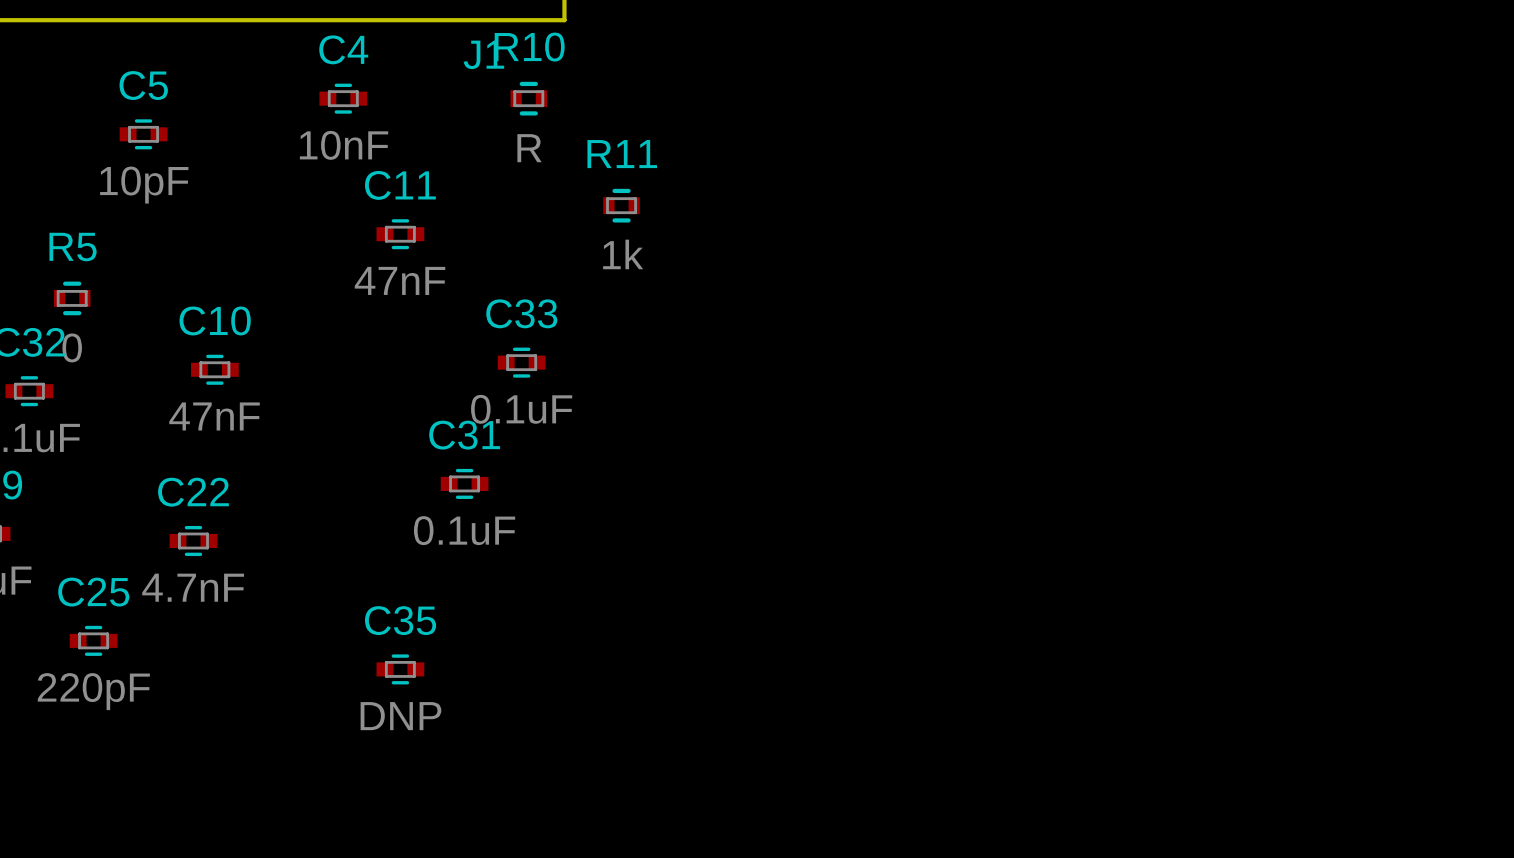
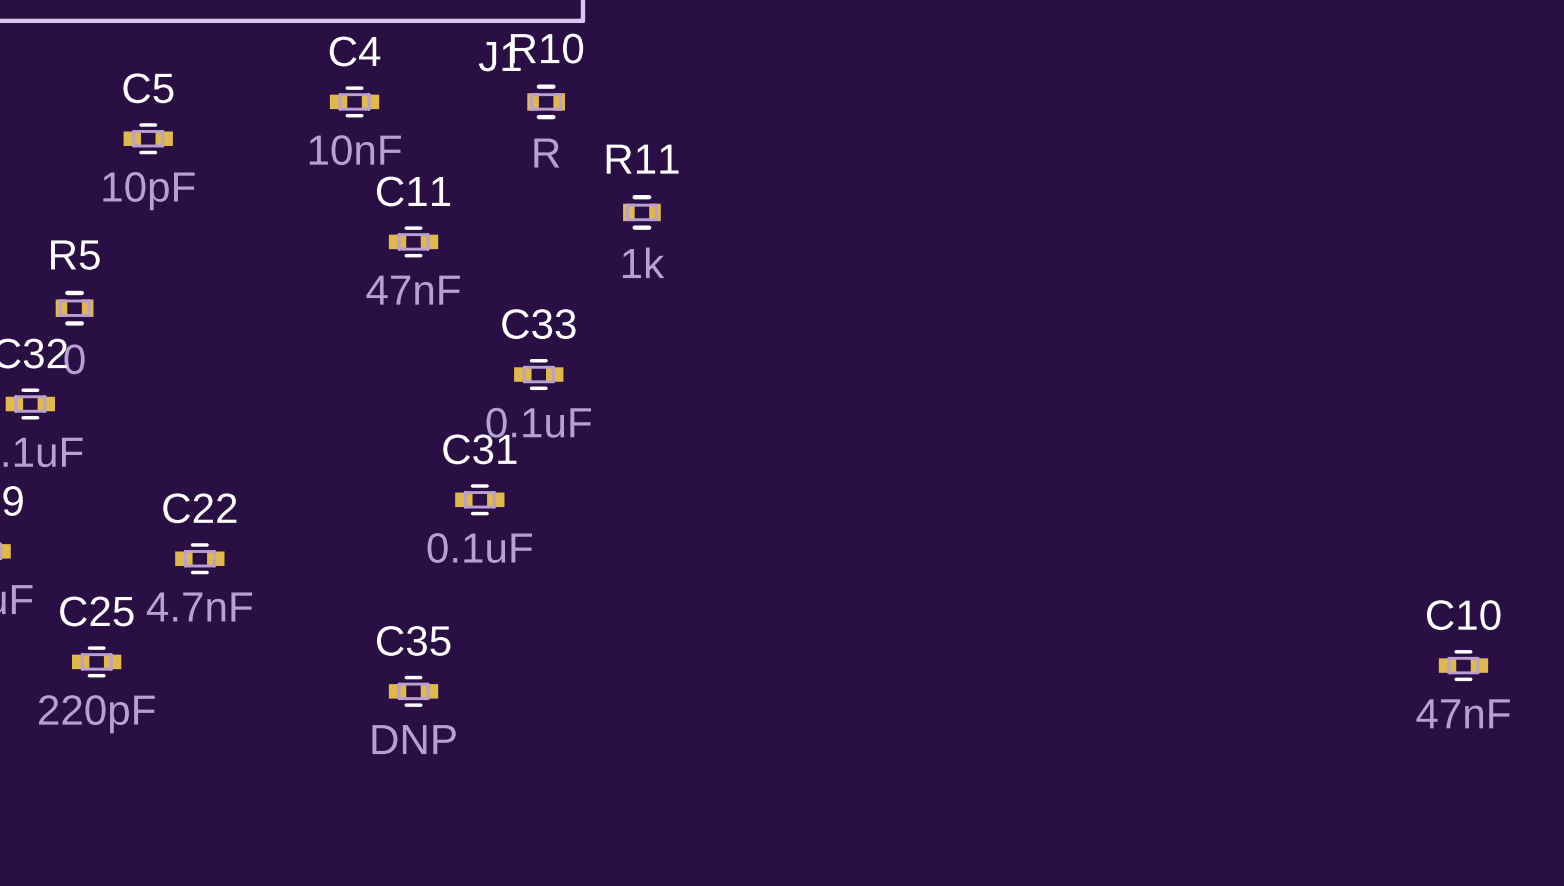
C10 position: (214, 369) -> (1463, 665)

